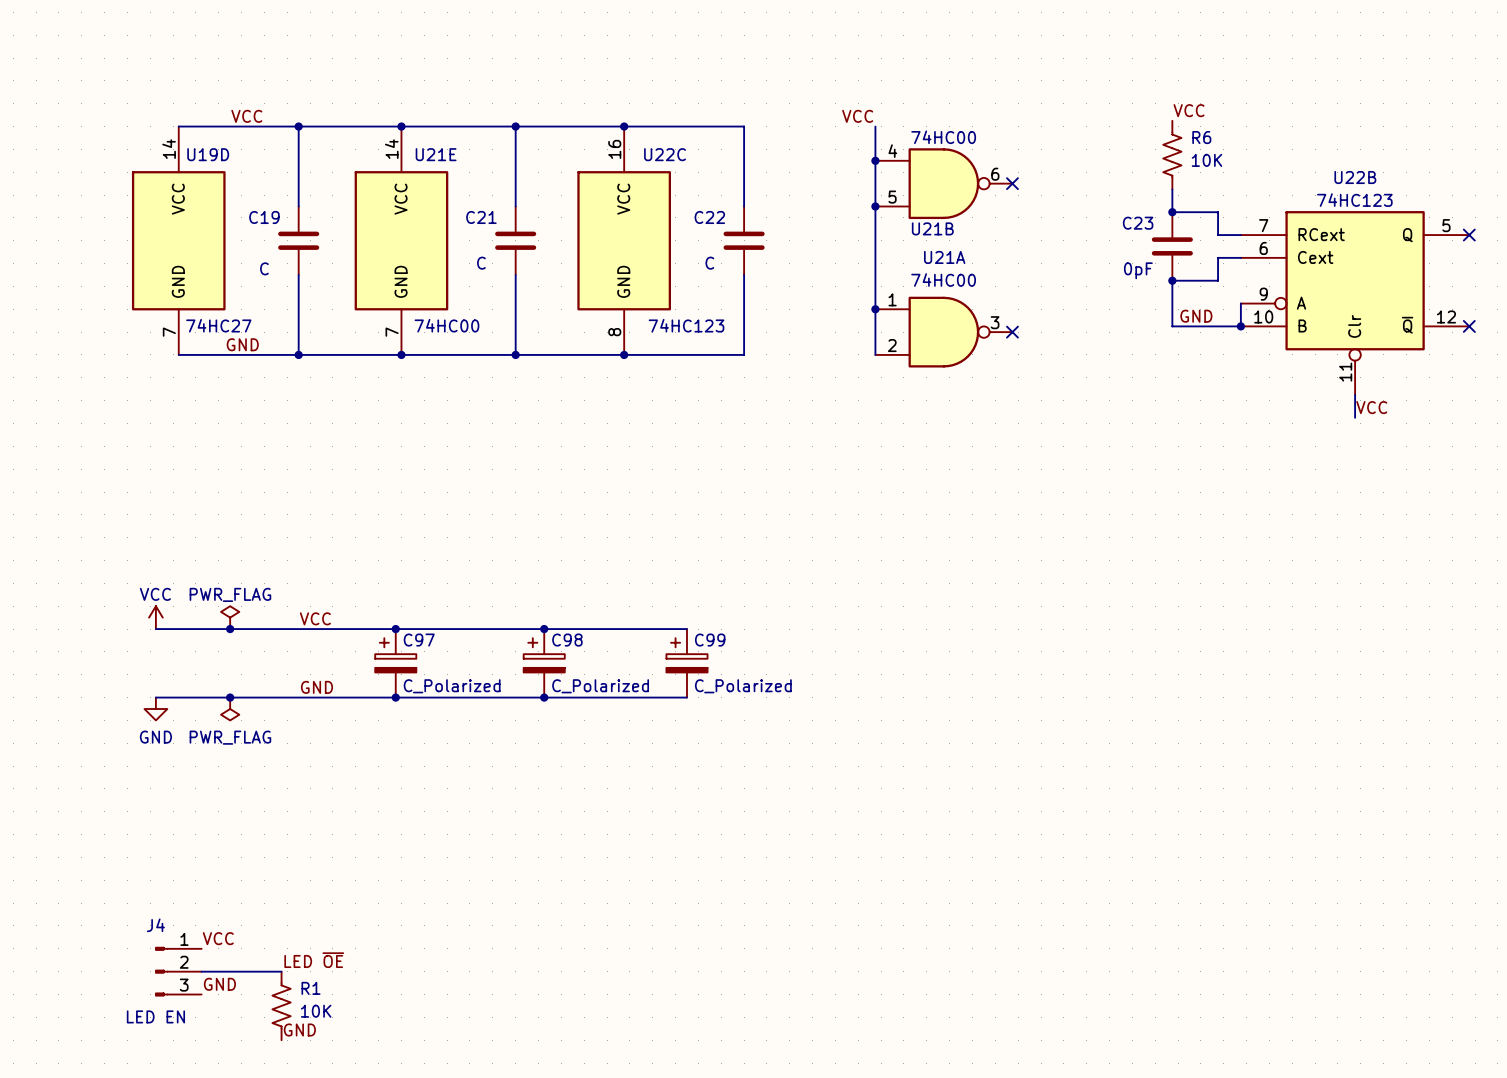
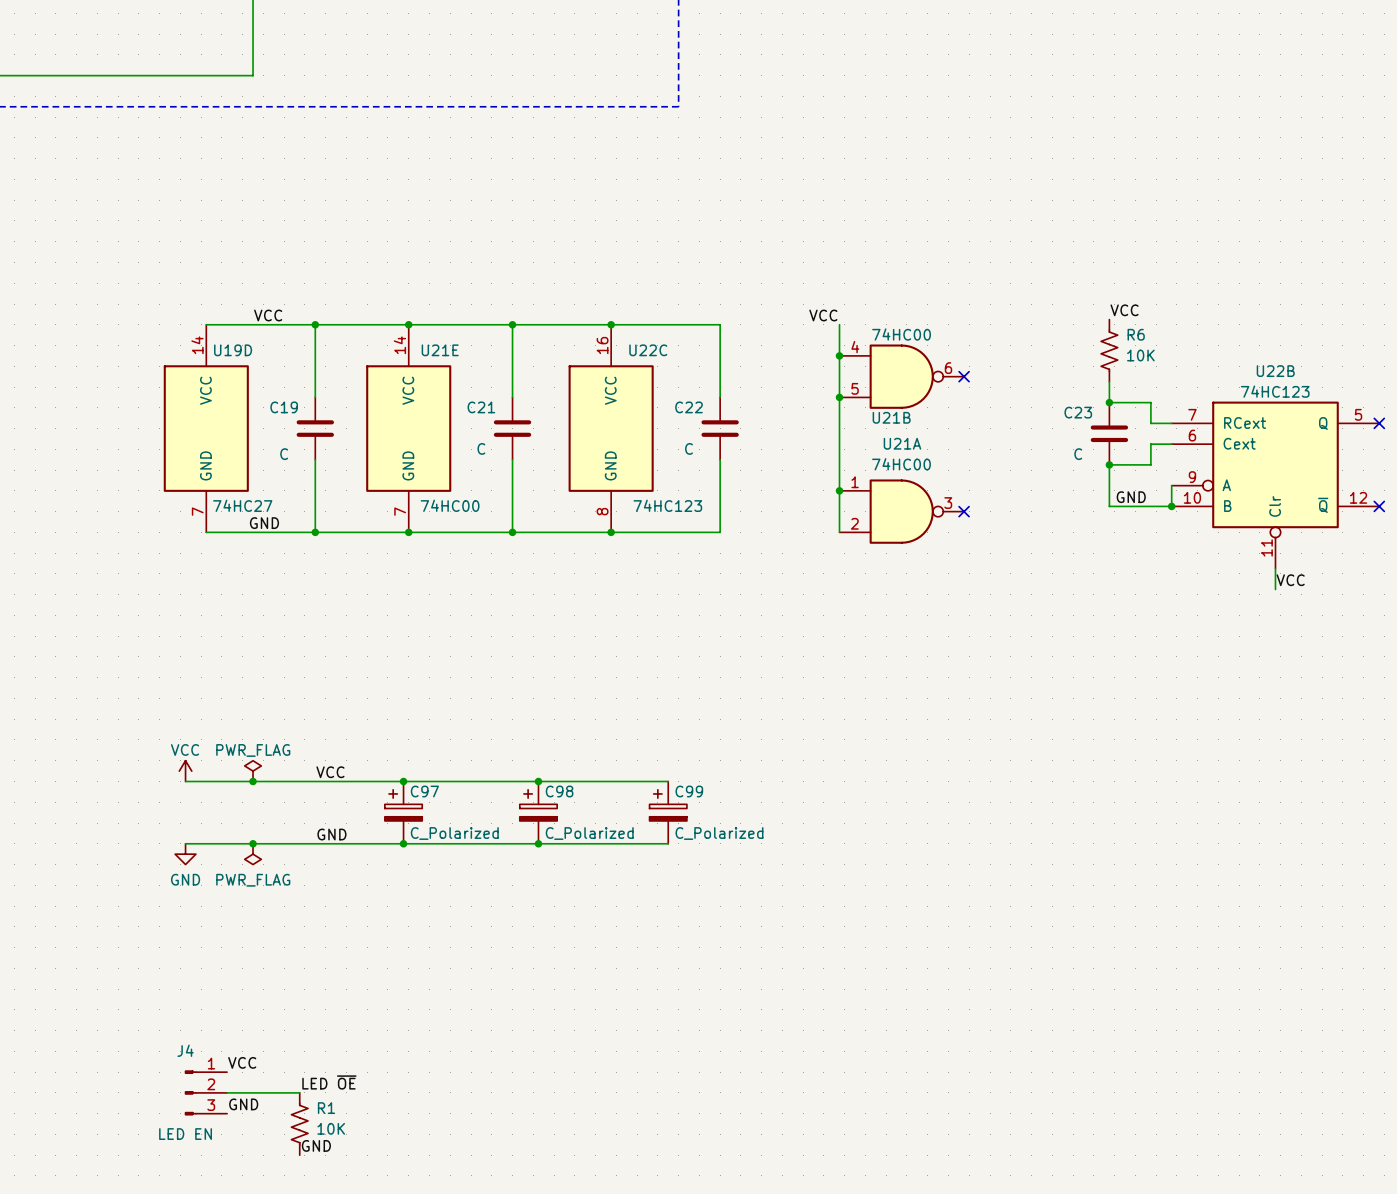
C23 value: 0pF (1138, 270) -> C (1078, 454)

